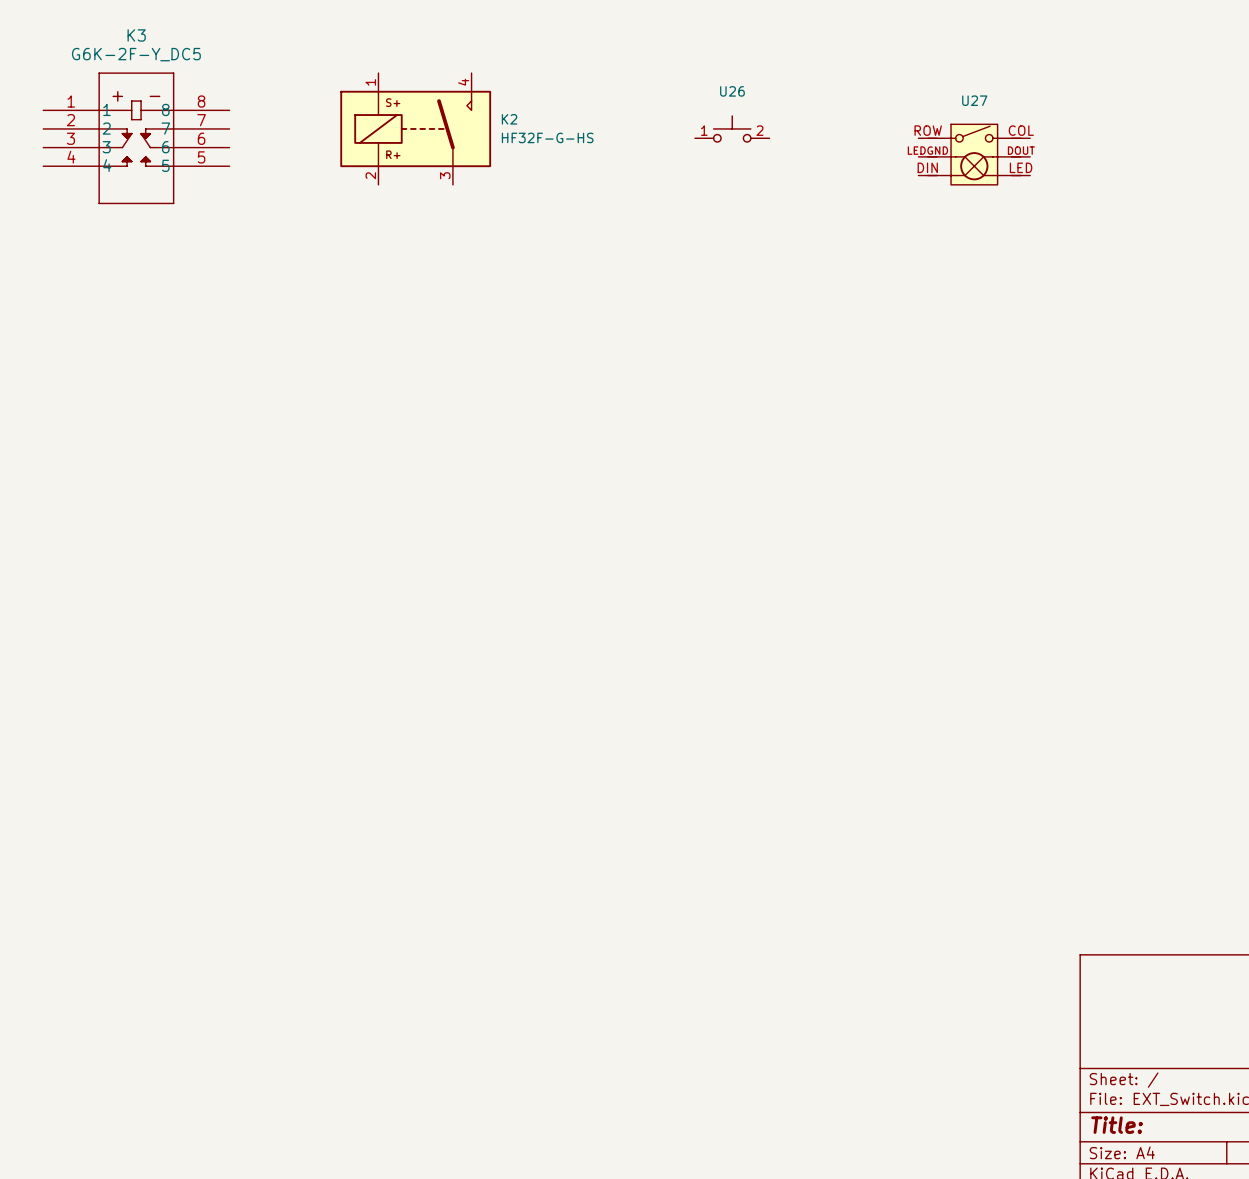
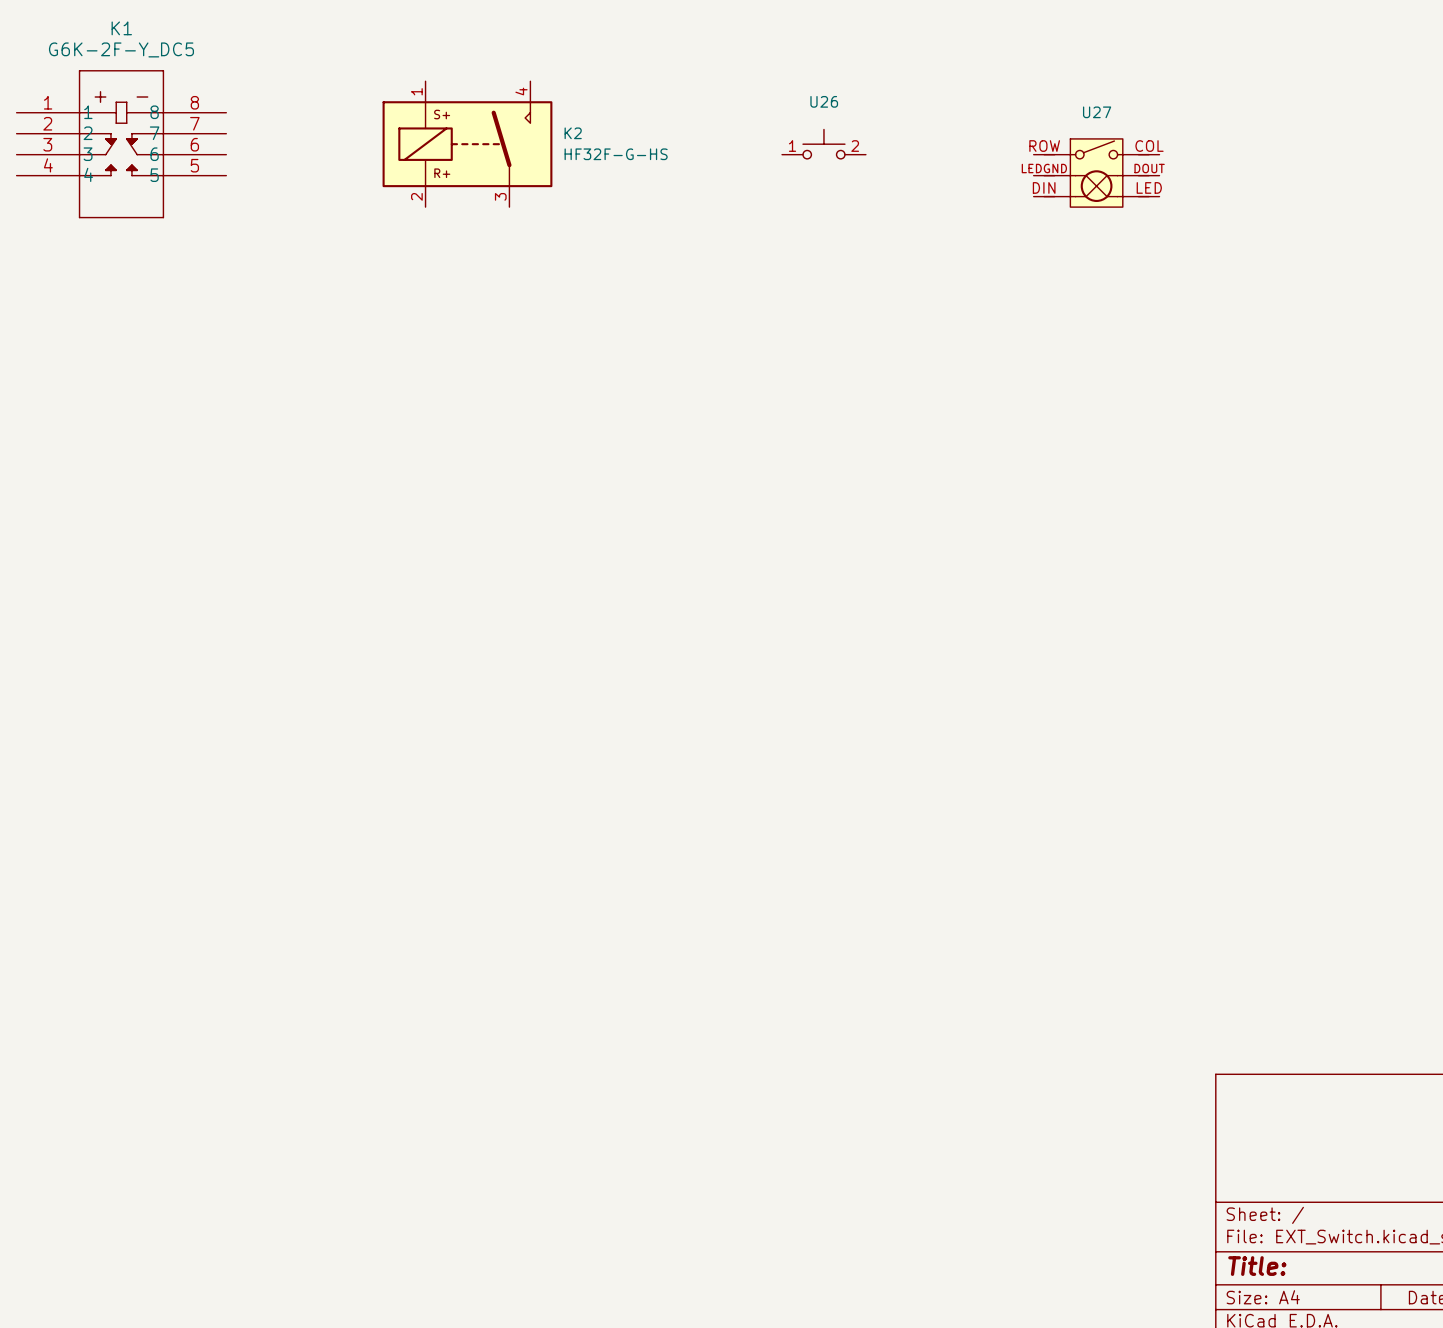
K1: none -> G6K-2F-Y_DC5 (121, 144)
K3: G6K-2F-Y_DC5 (136, 138) -> none

